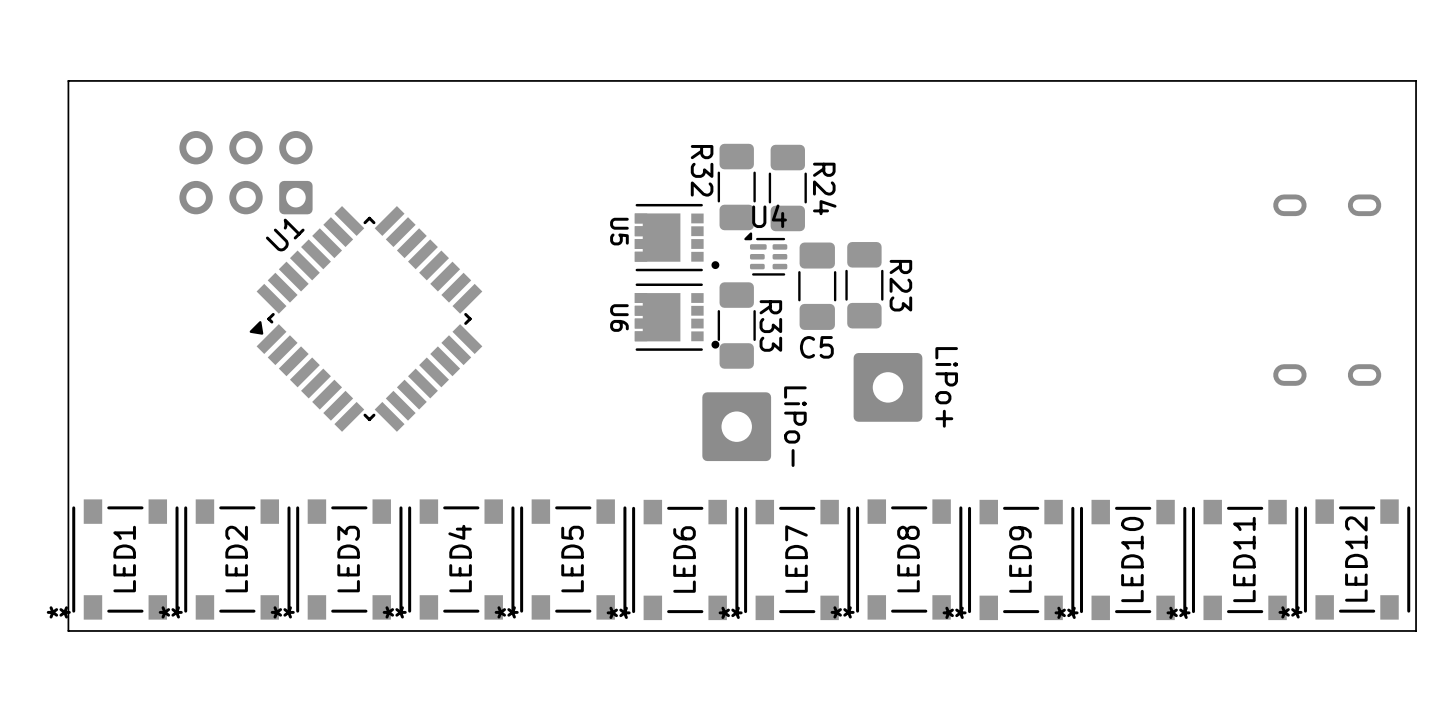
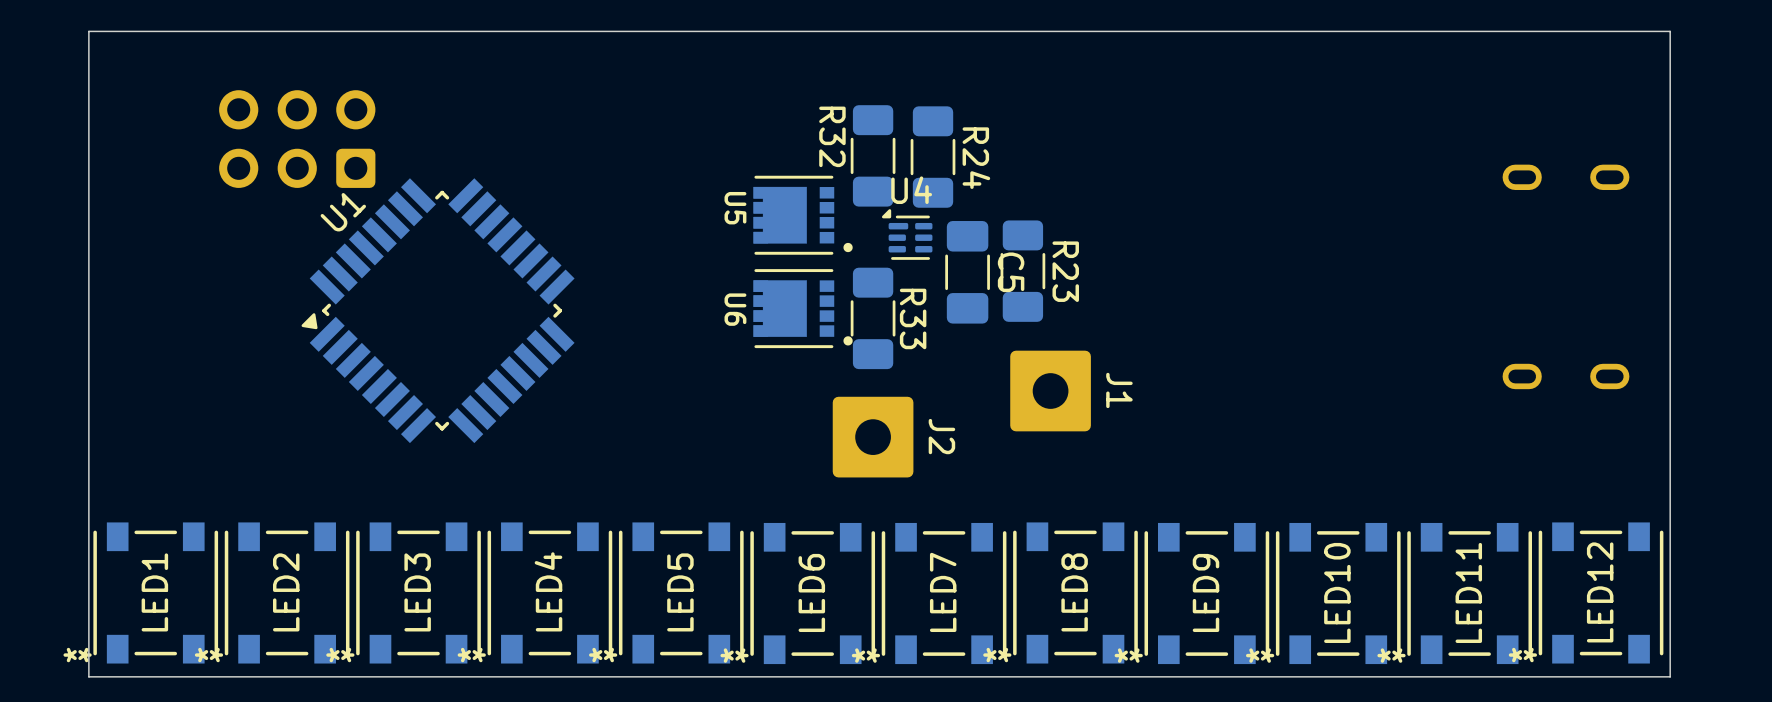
C5 name rotation: 0° (816, 347) -> 90° clockwise (1011, 272)
C5 name position: C5 (816, 347) -> C5 (1011, 272)
LiPo+ name: LiPo+ (946, 387) -> J1 (1119, 390)
LiPo- name: LiPo- (795, 426) -> J2 (941, 436)

